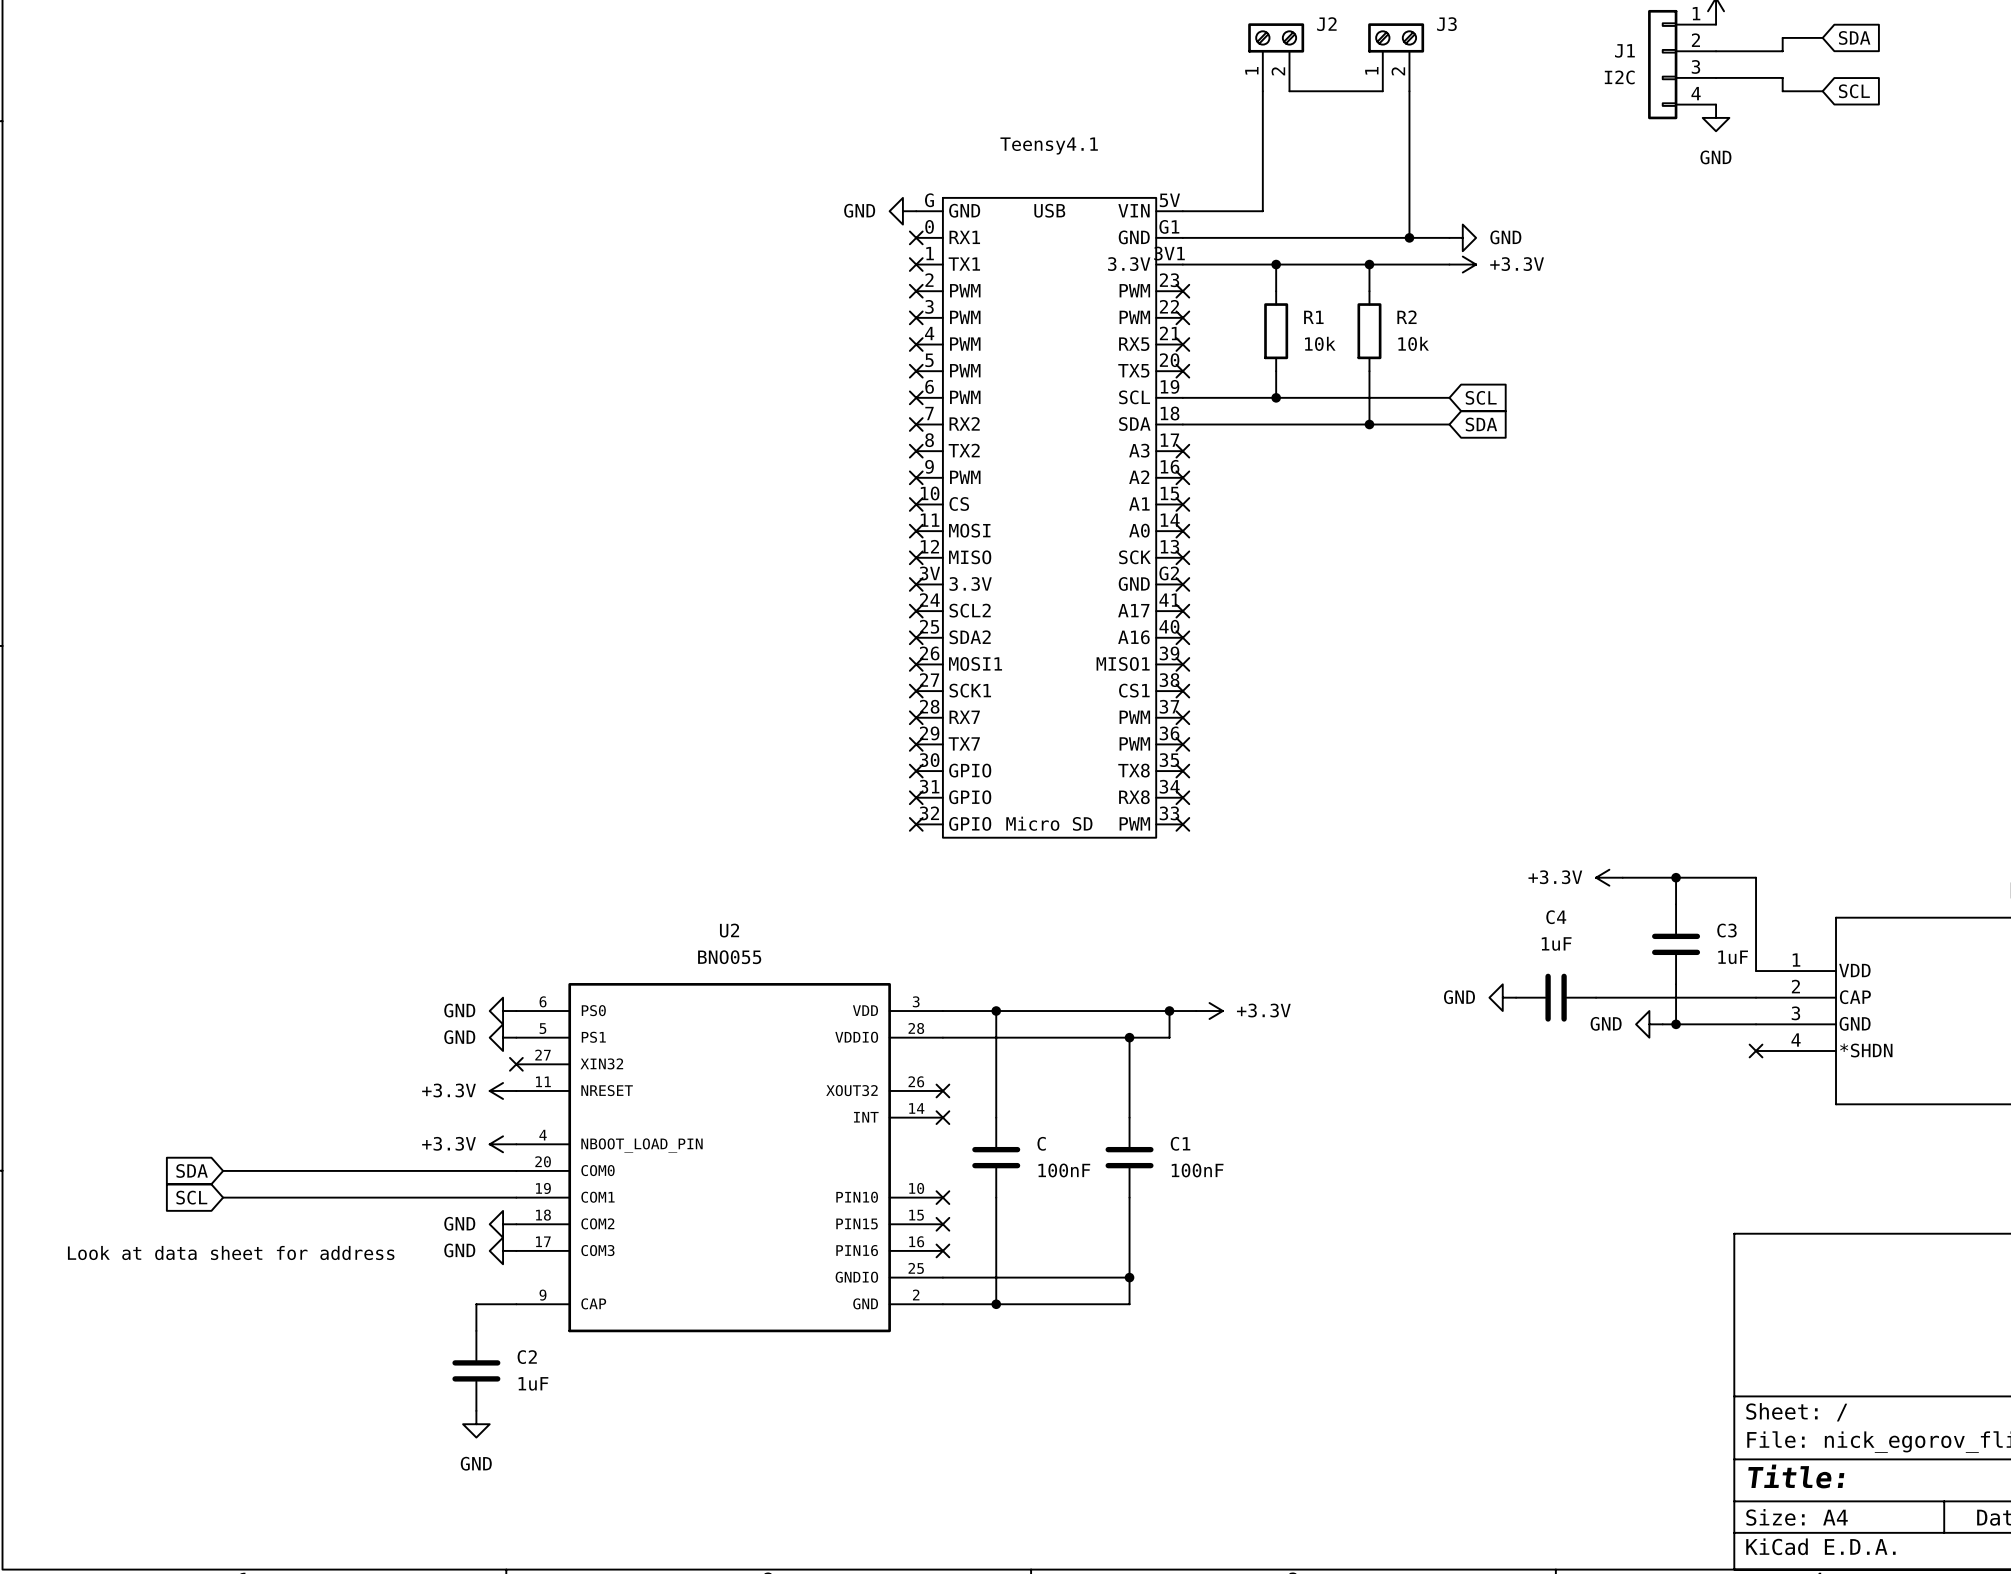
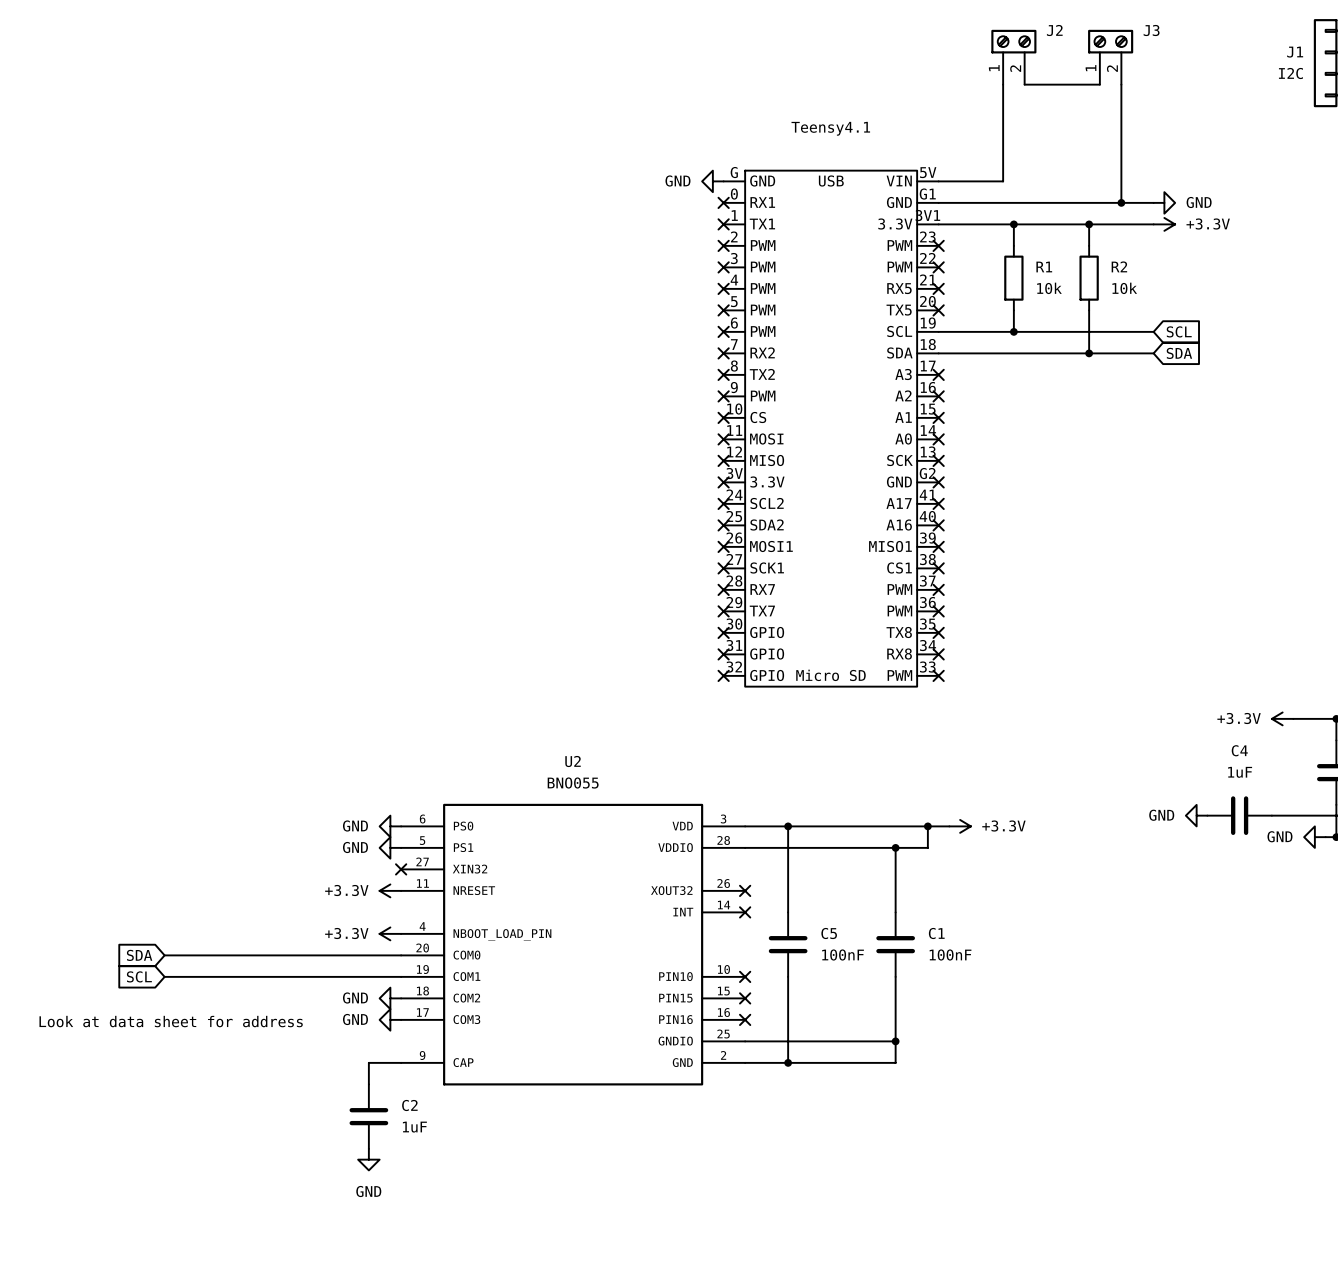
C name: C (1041, 1143) -> C5 (829, 933)

